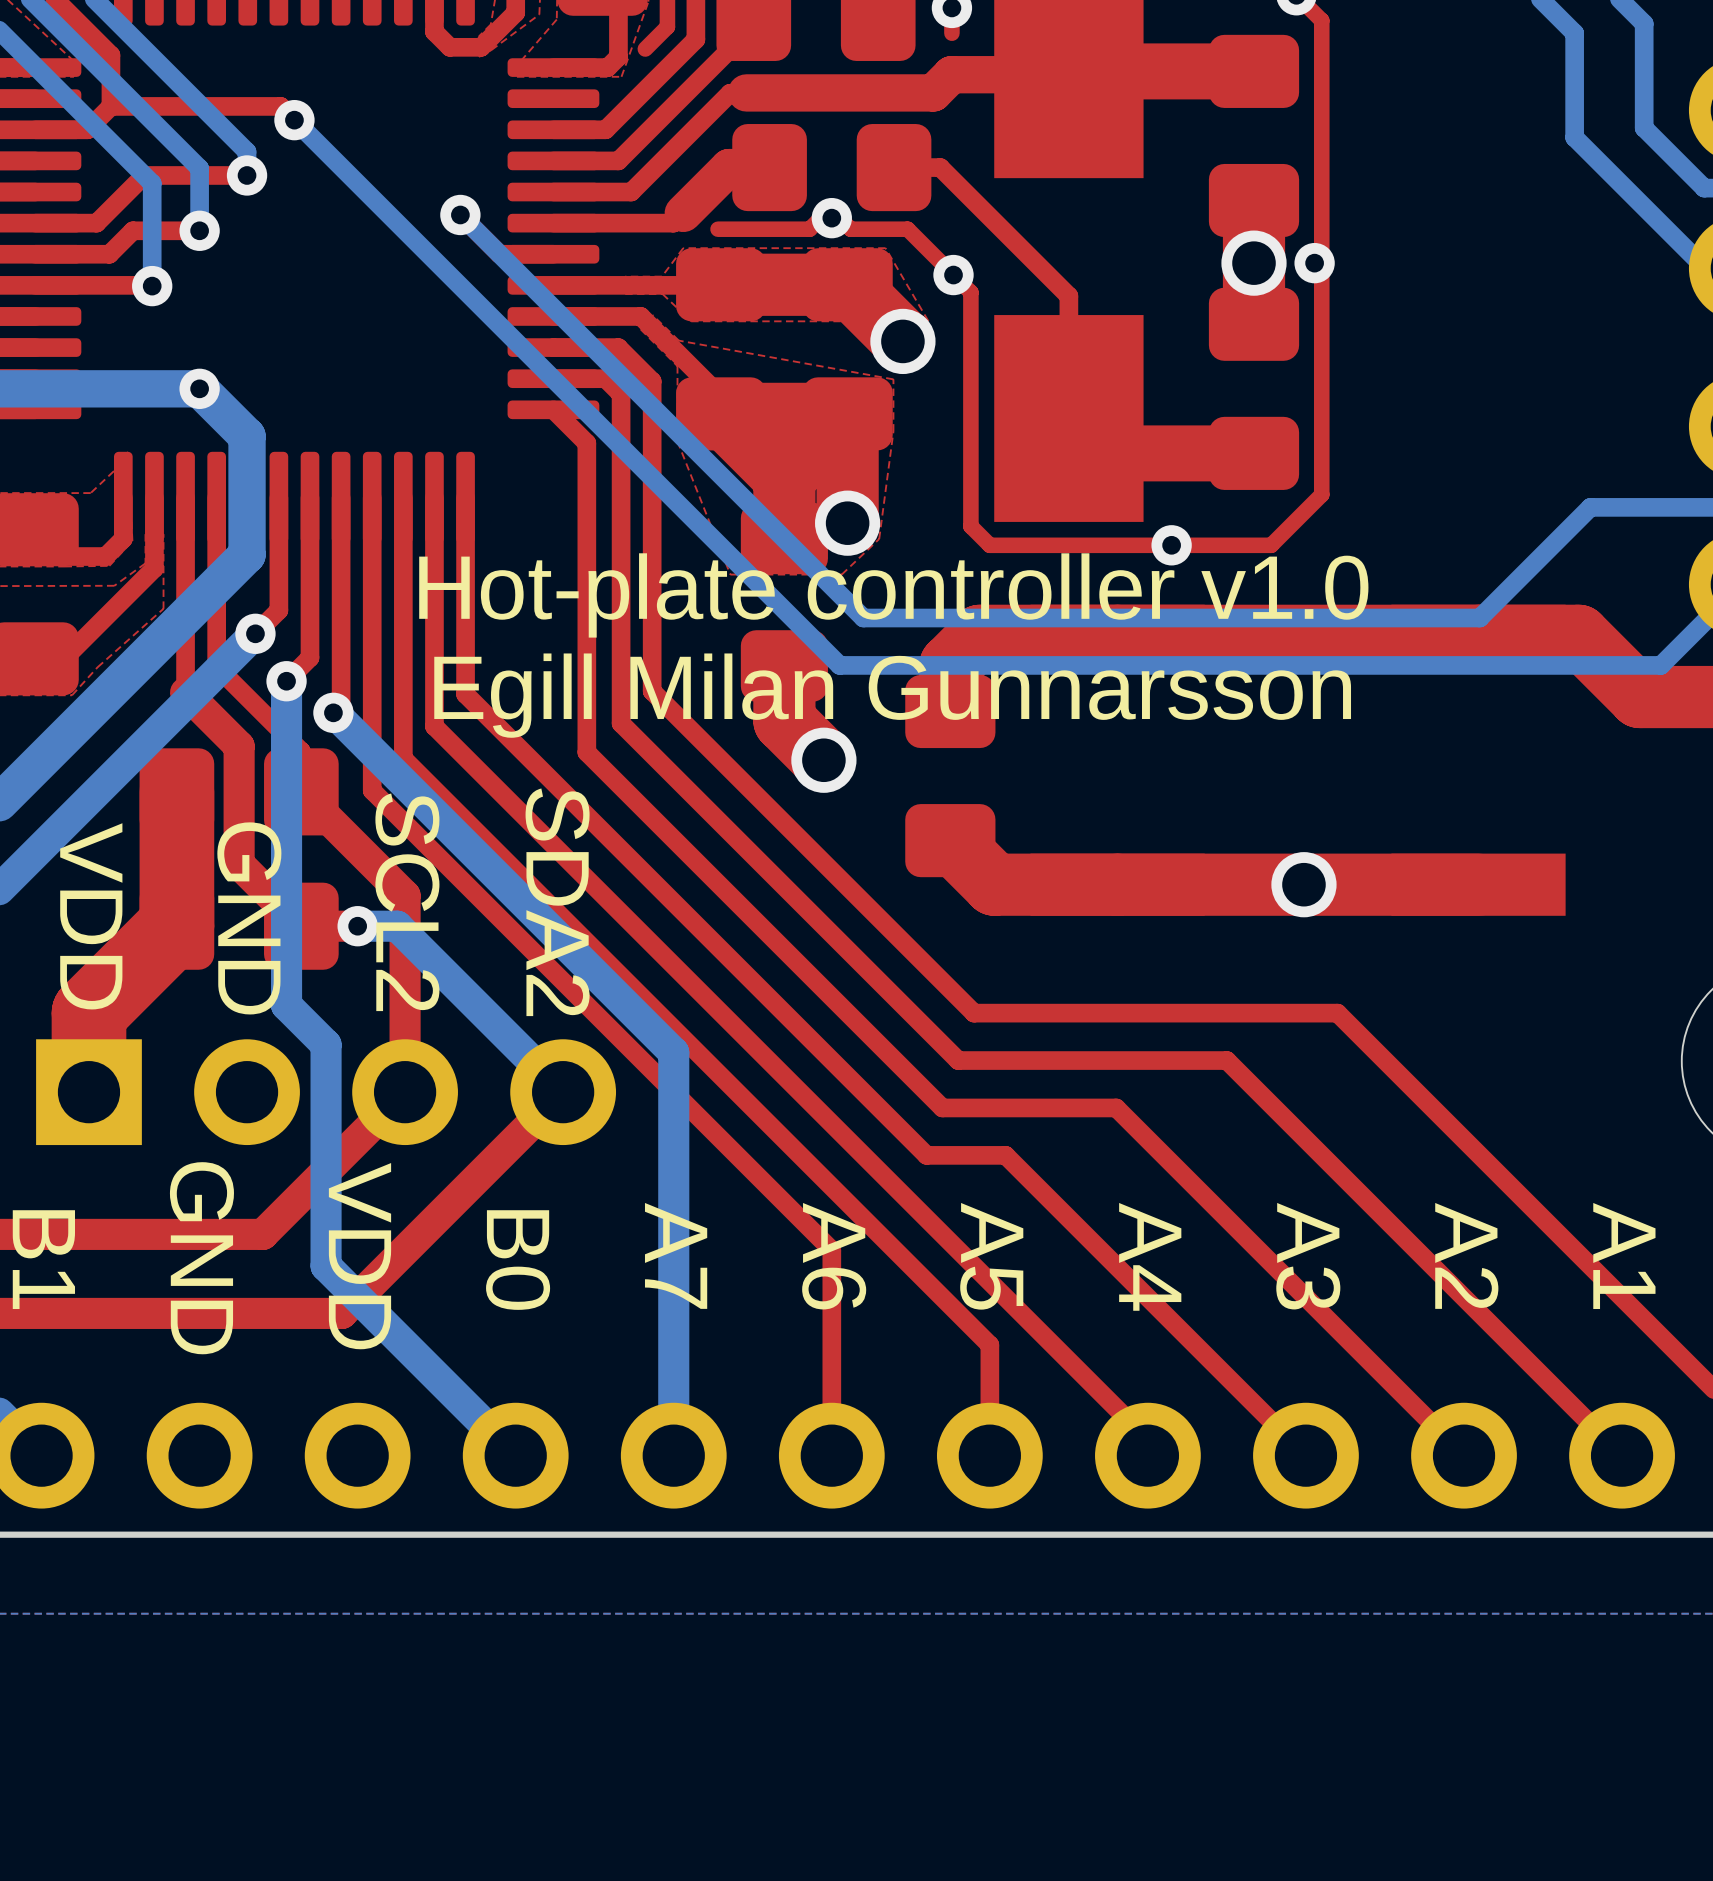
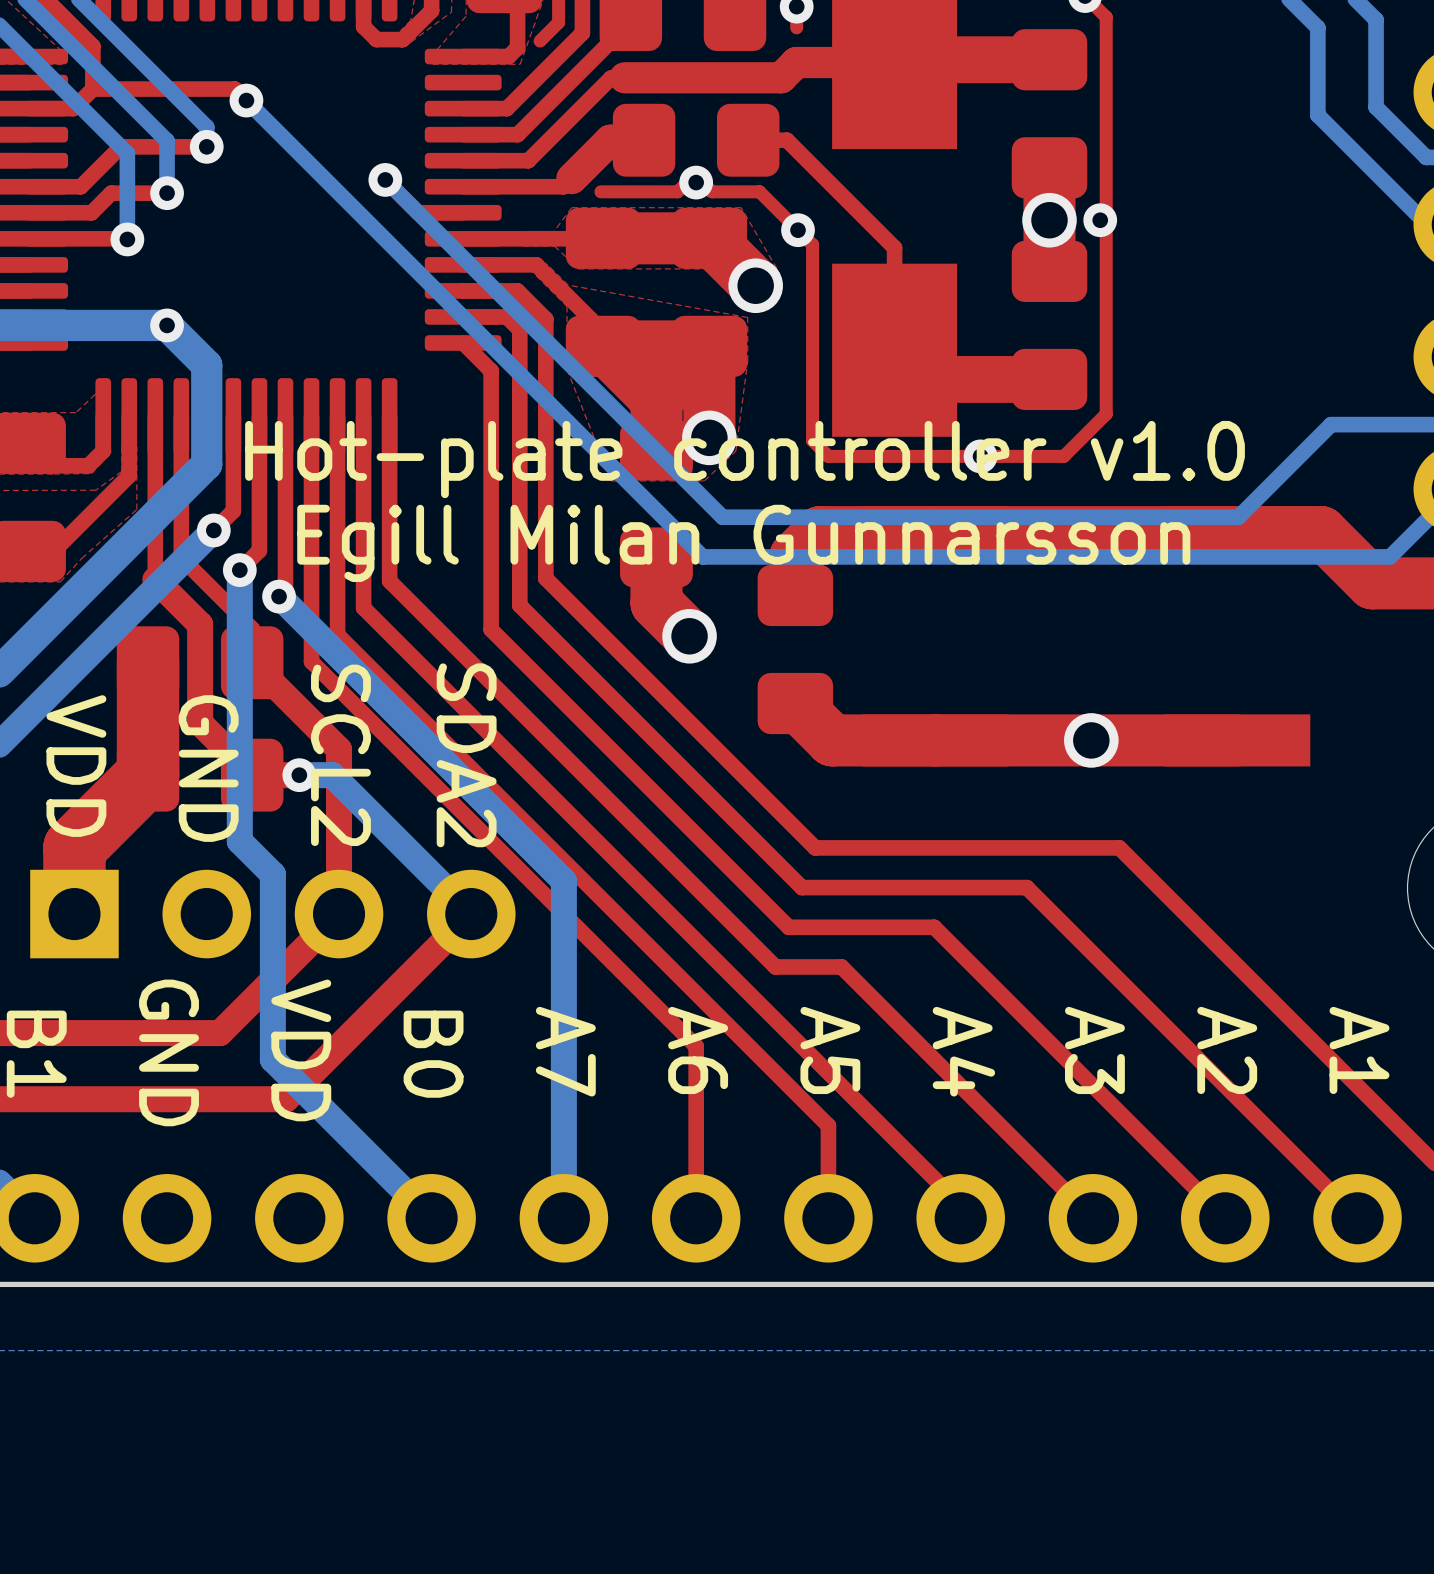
text position: Hot-plate controller v1.0 (893, 595) -> Hot-plate controller v1.0 (745, 459)
text position: Egill Milan Gunnarsson (892, 695) -> Egill Milan Gunnarsson (743, 543)

